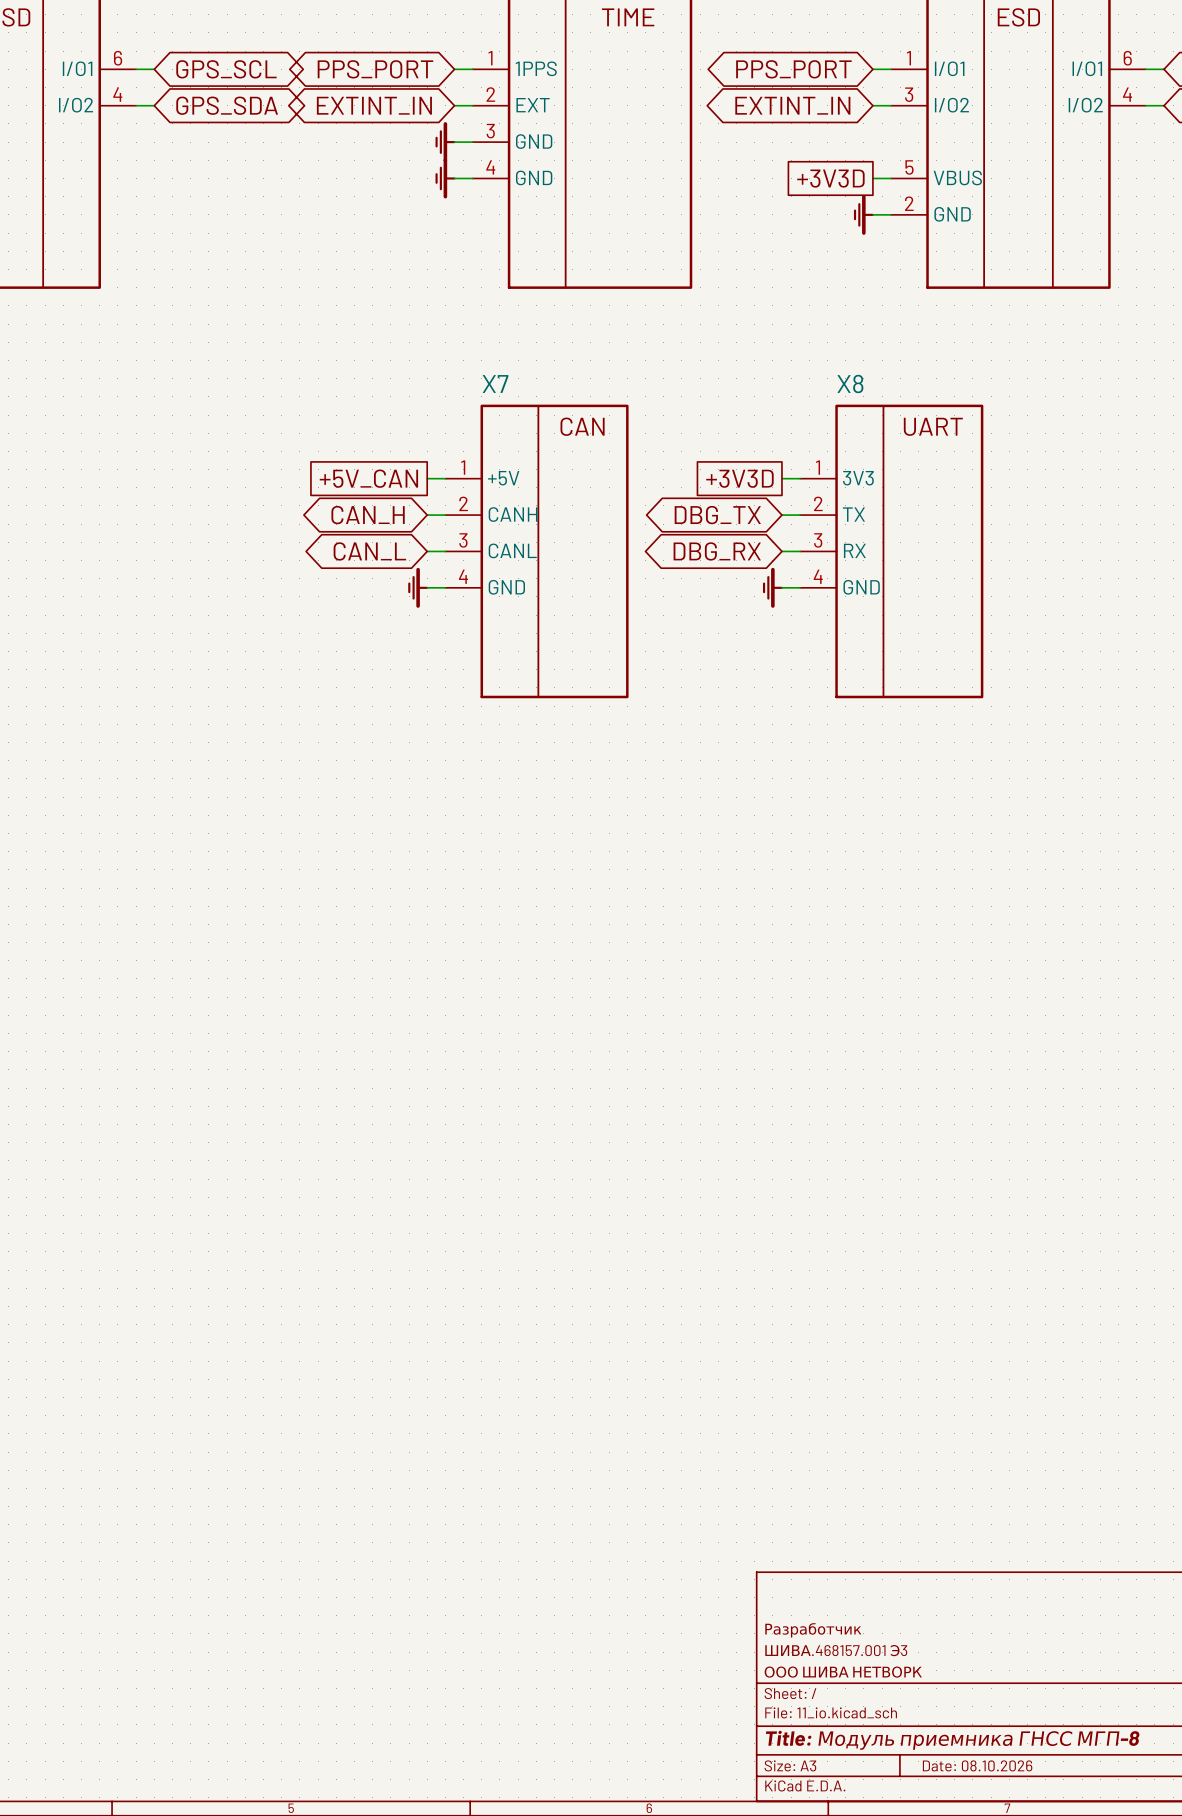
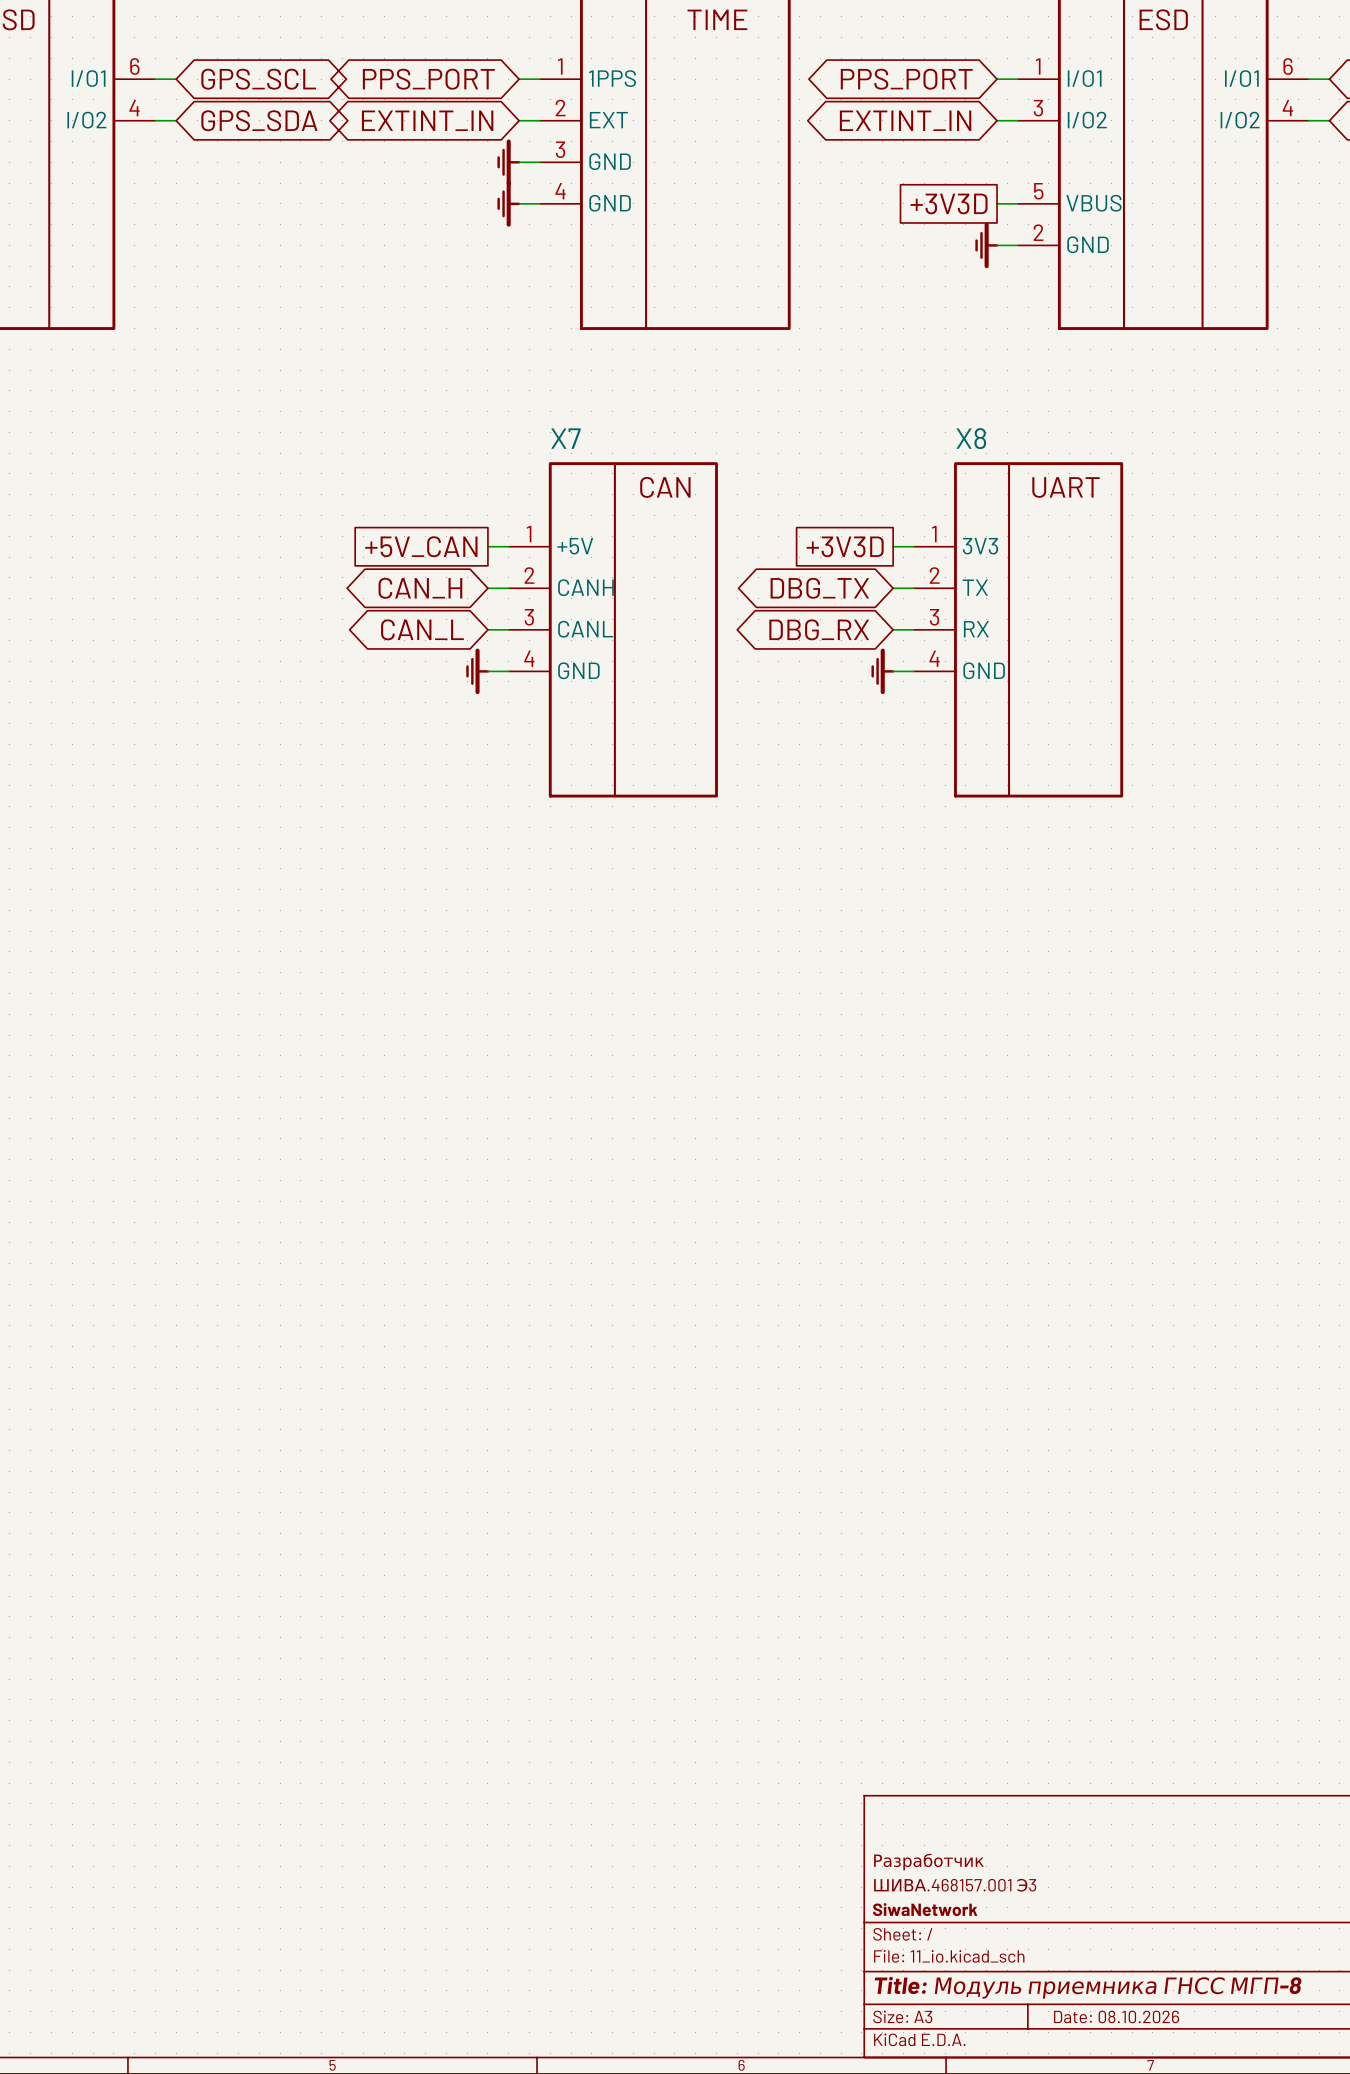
title block: ООО ШИВА НЕТВОРК (843, 1672) -> SiwaNetwork (925, 1909)

